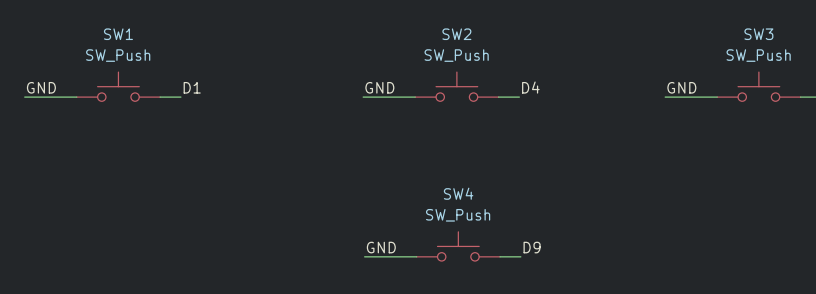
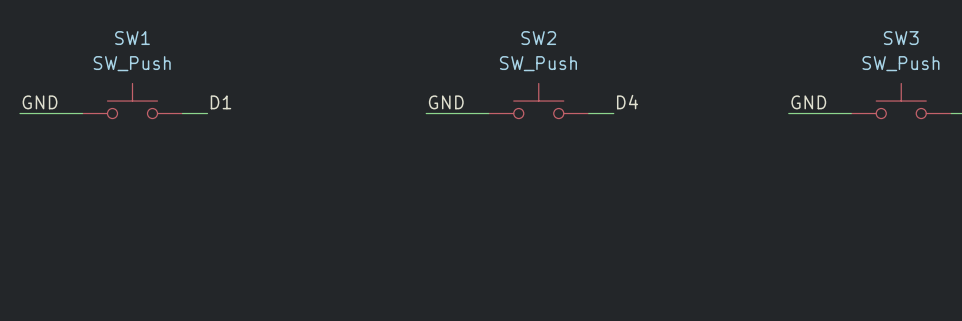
SW4: SW_Push (458, 246) -> none
label: GND (381, 247) -> none
label: D9 (532, 247) -> none
wire: (364, 256) (416, 256) -> none
wire: (500, 256) (520, 256) -> none

